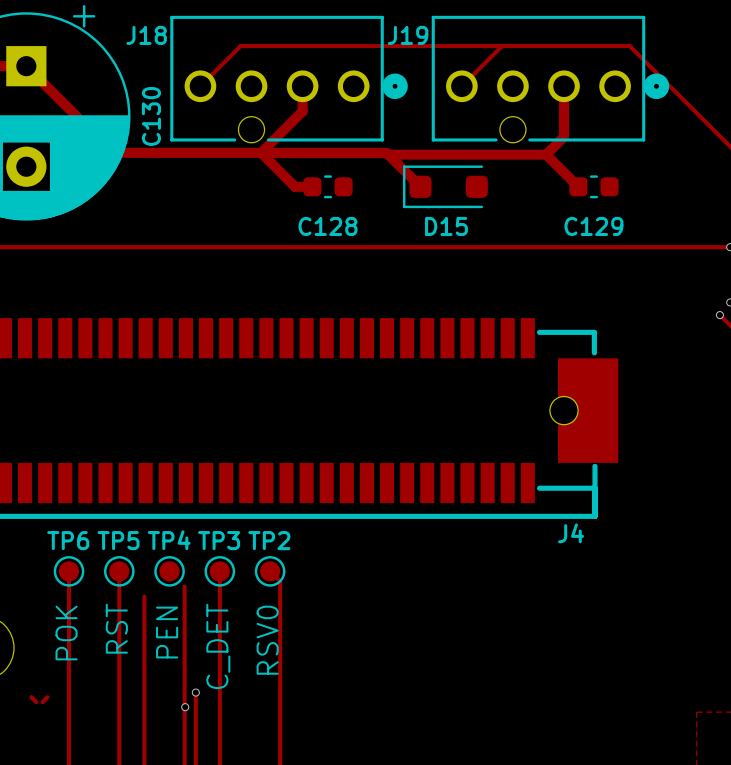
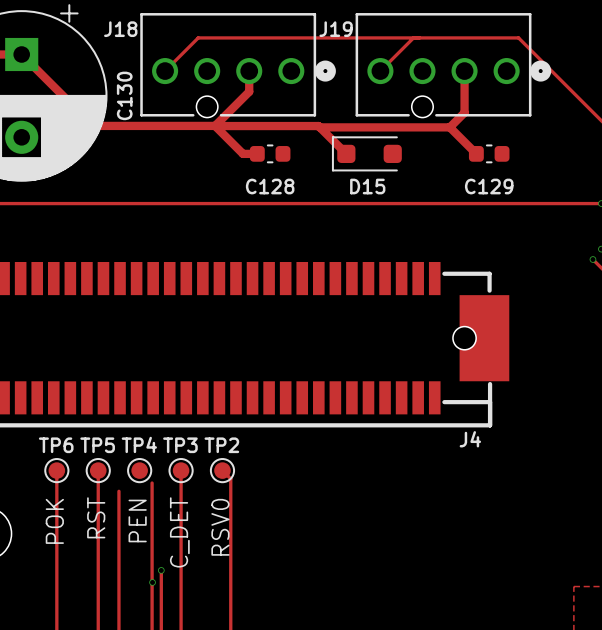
track: (31, 697) (36, 702) -> none
track: (47, 697) (42, 702) -> none

